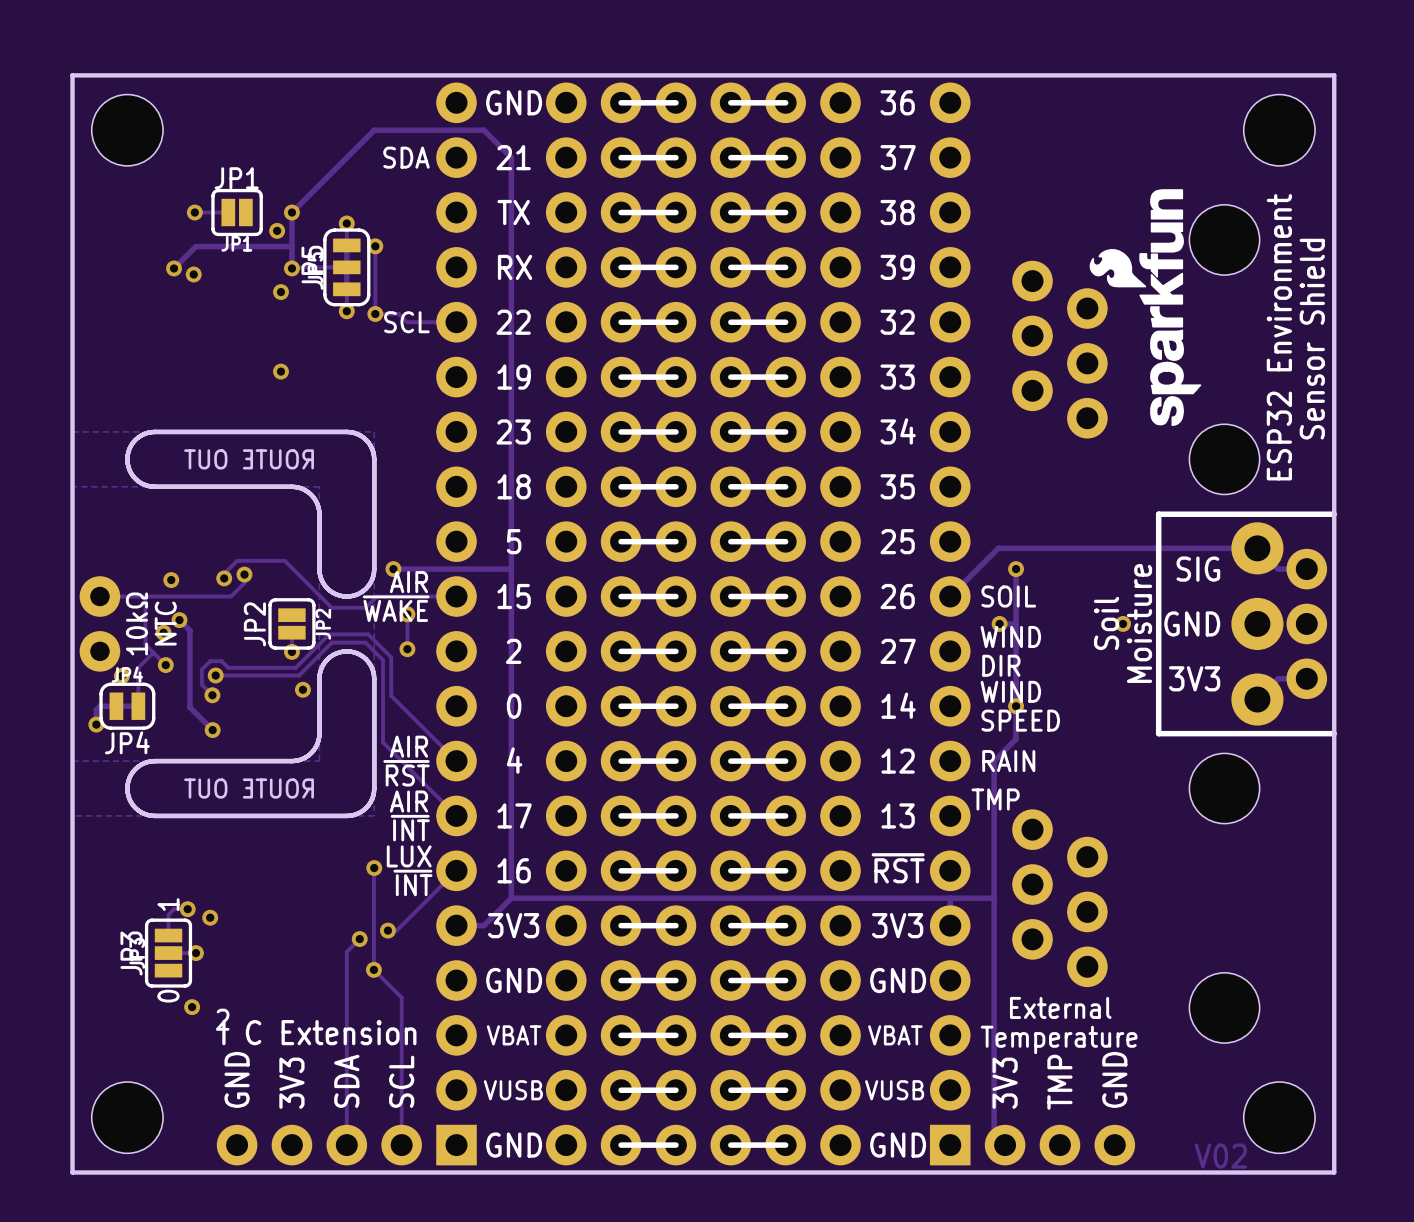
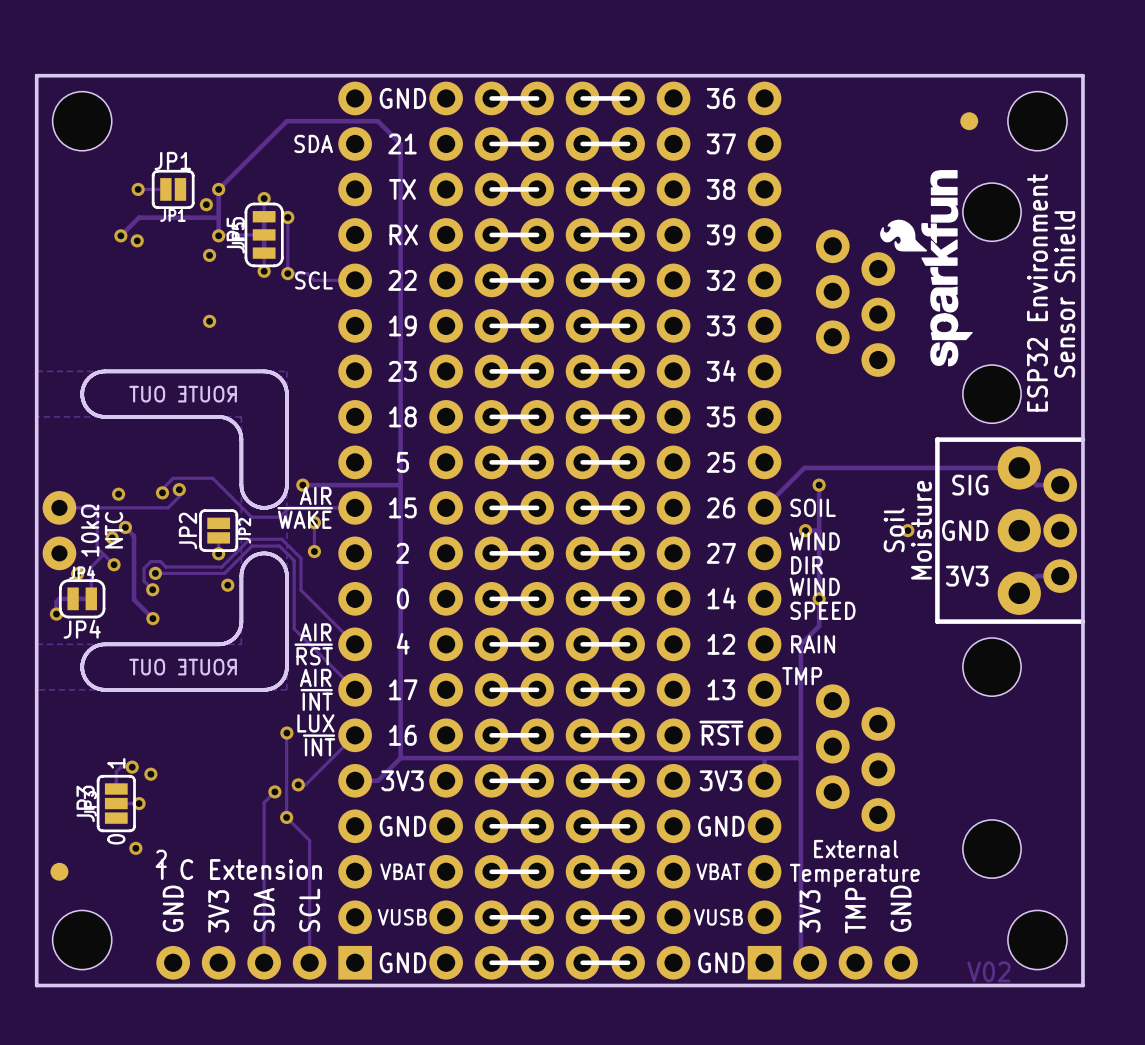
part: none -> (969, 121)
part: none -> (59, 871)

